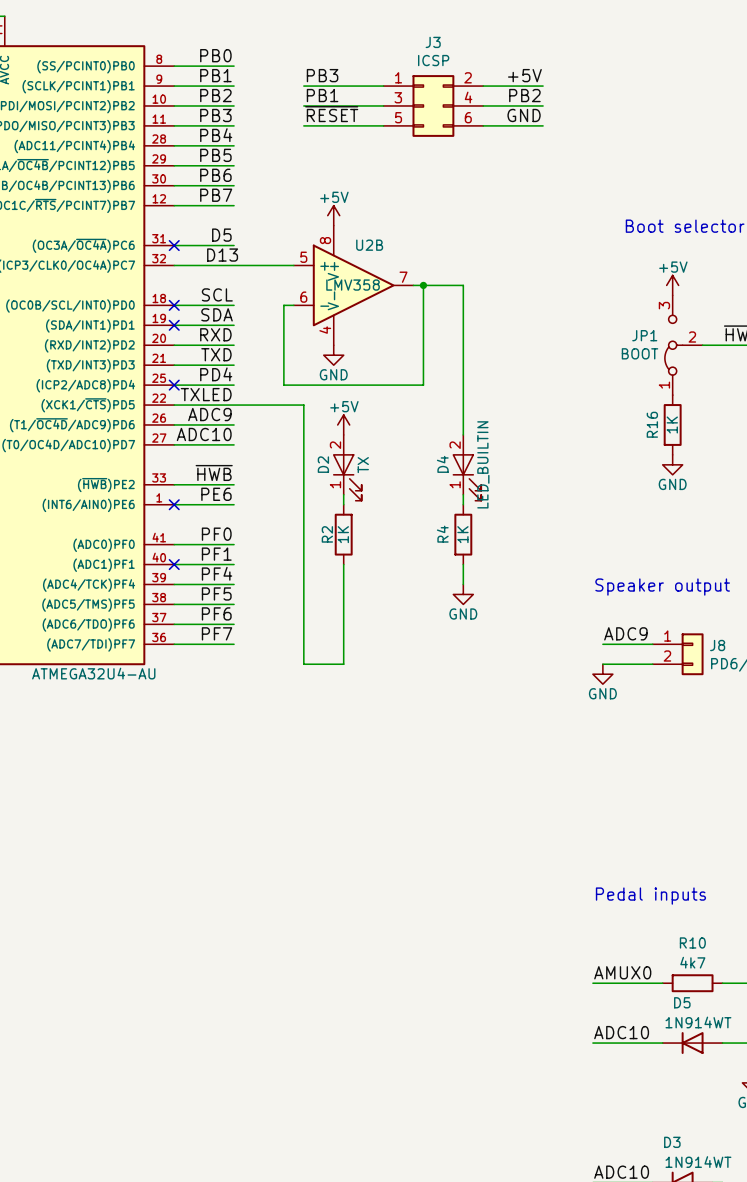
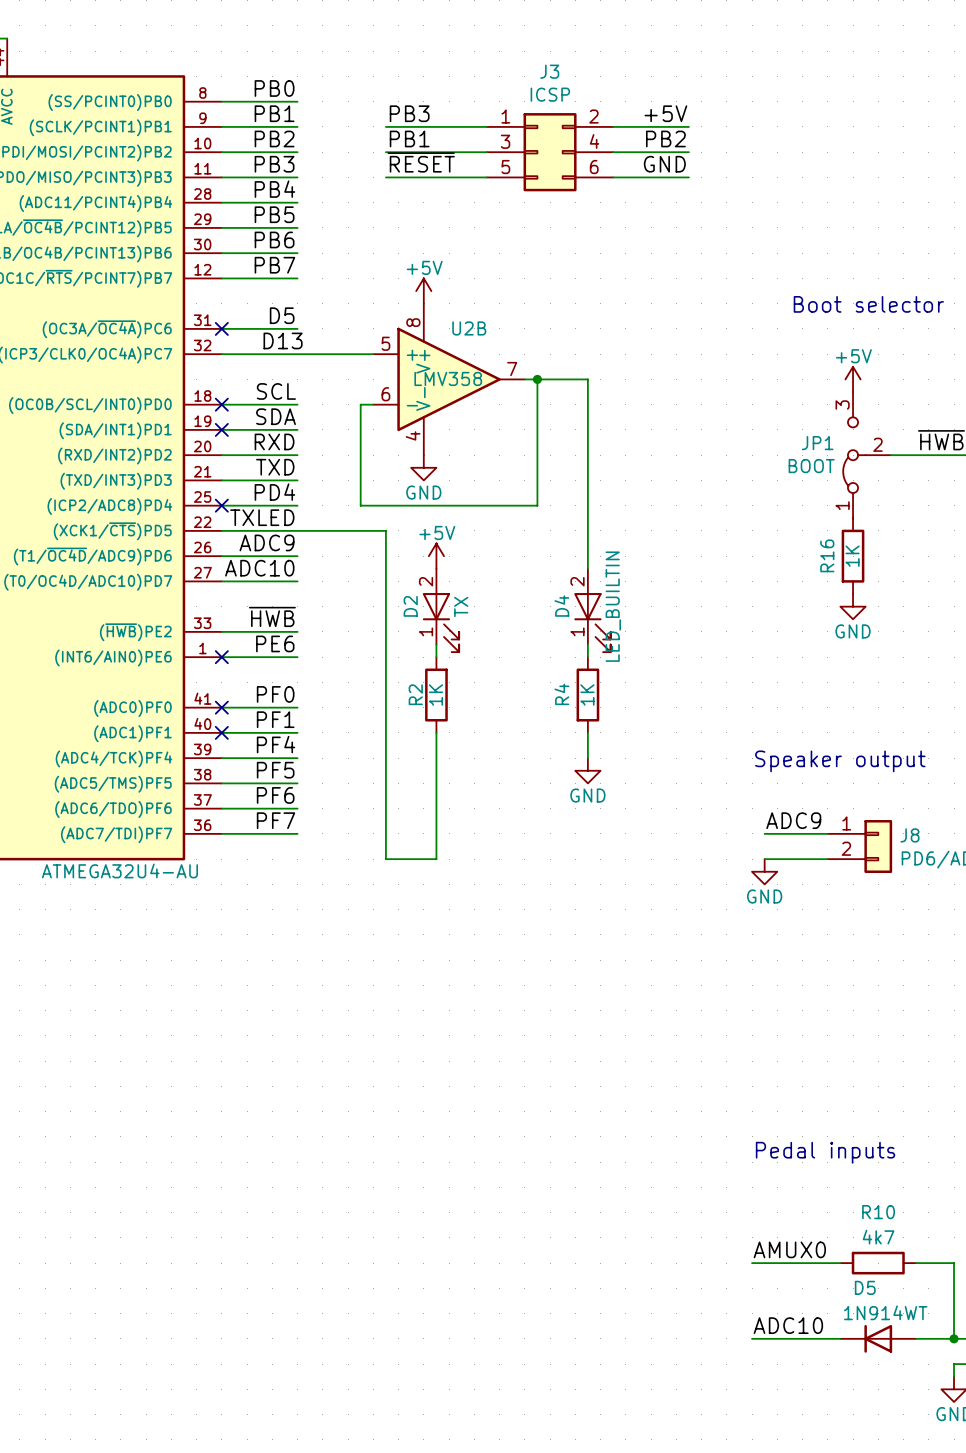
no-connect mark: none -> (221, 707)

